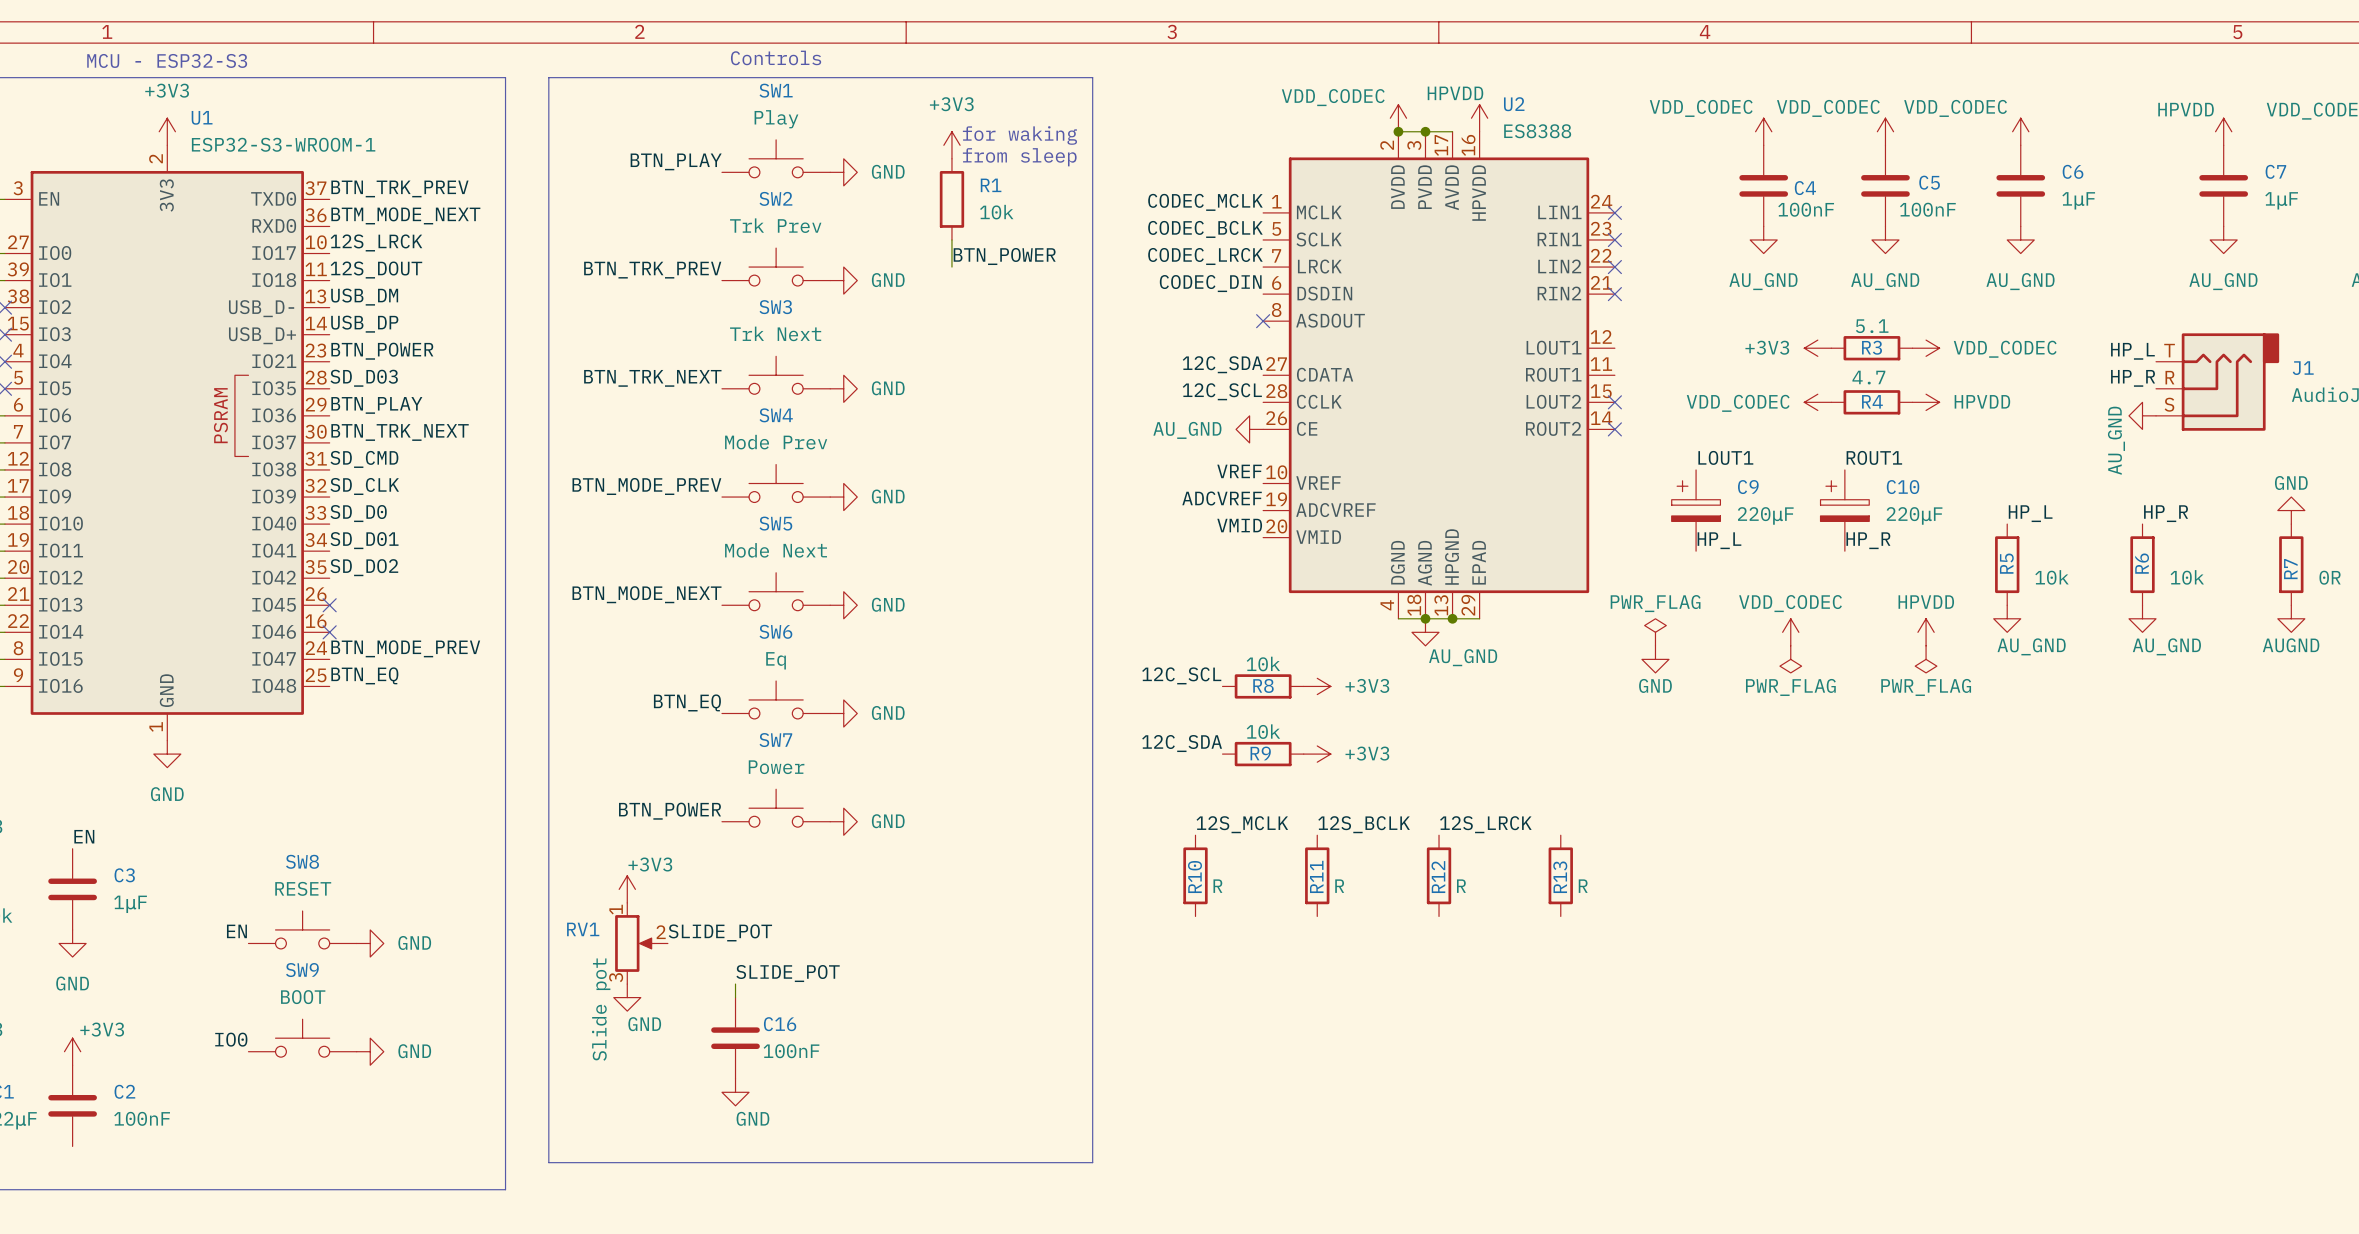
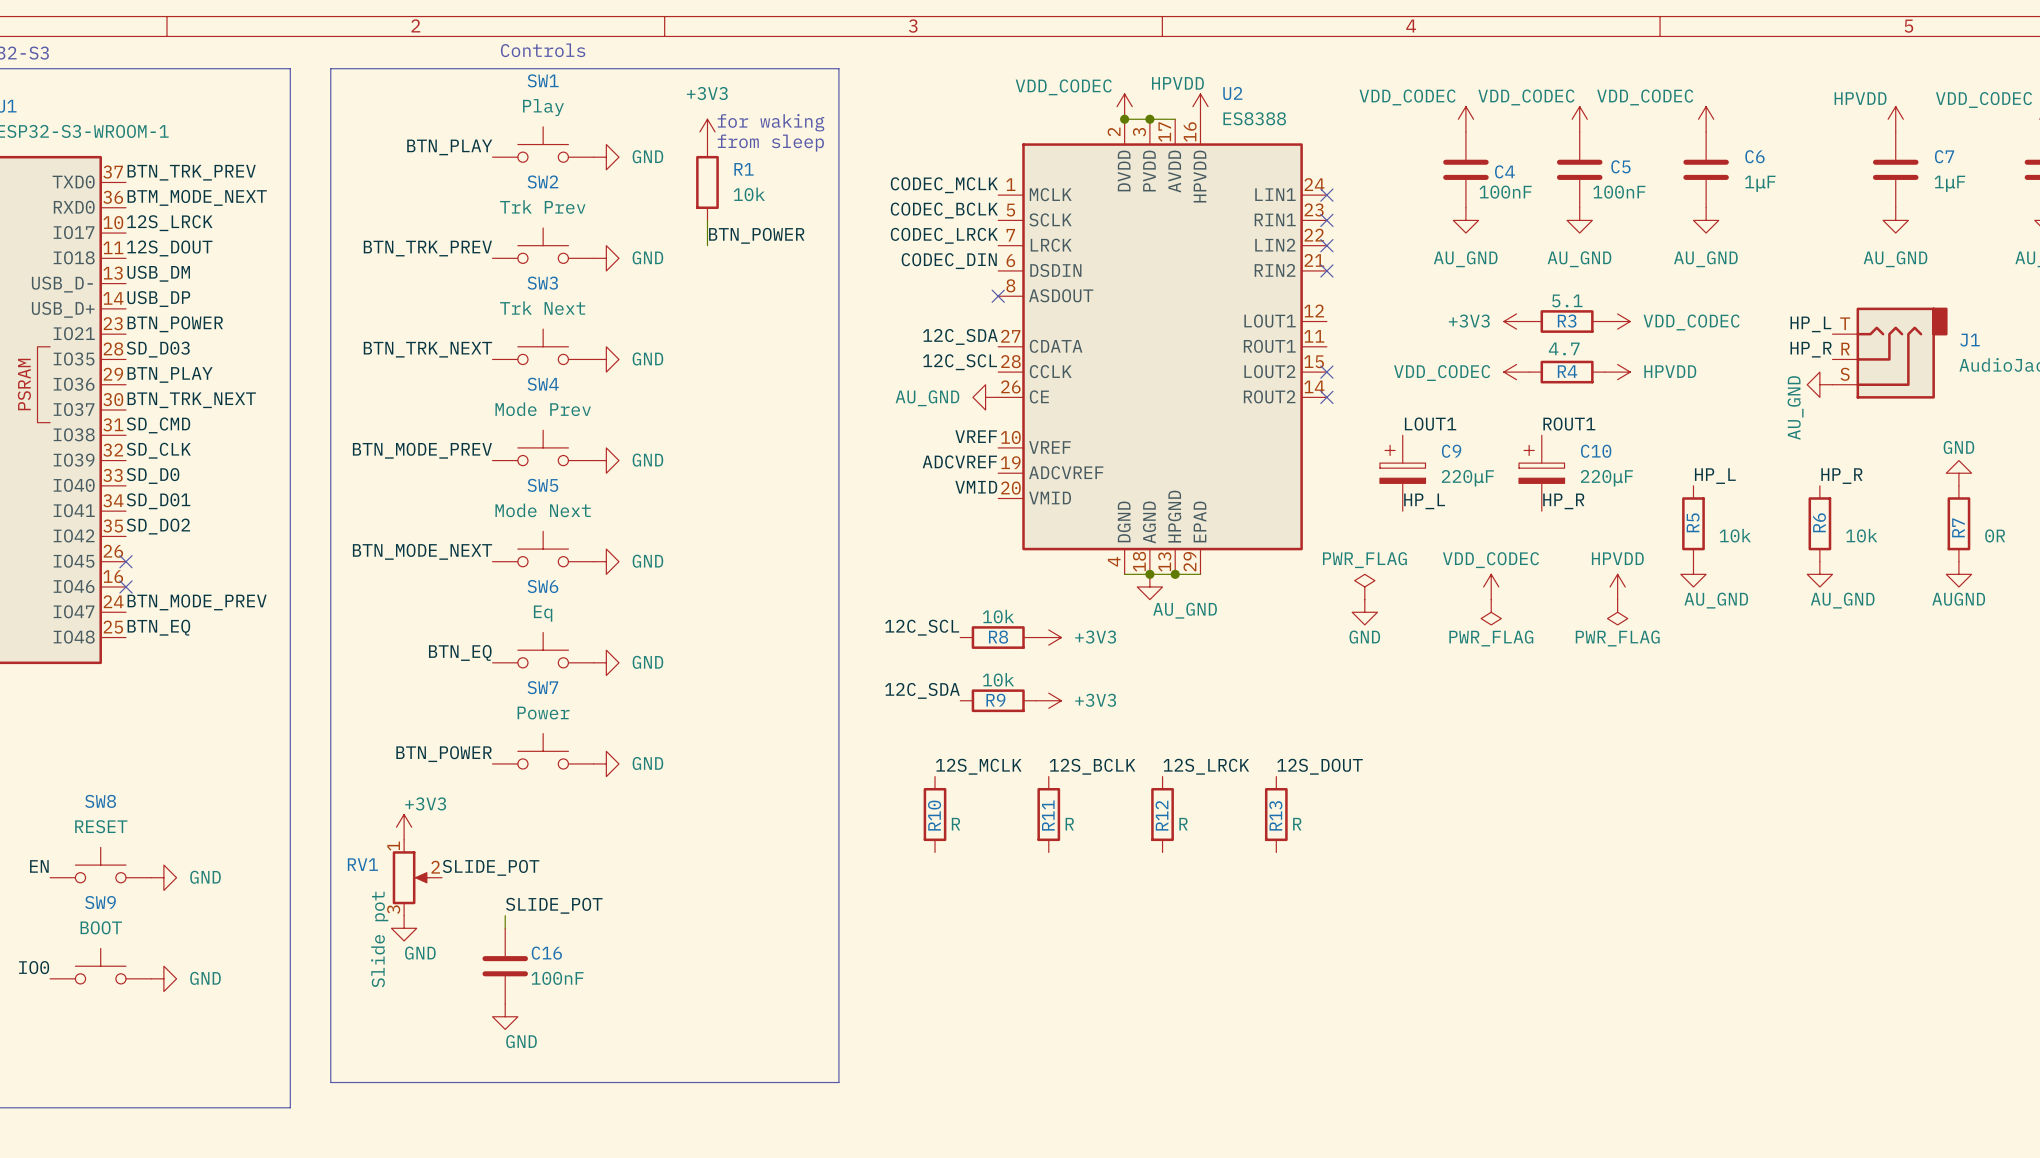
label: none -> 12S_DOUT (1320, 766)

